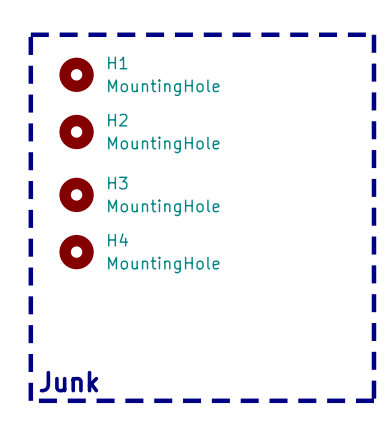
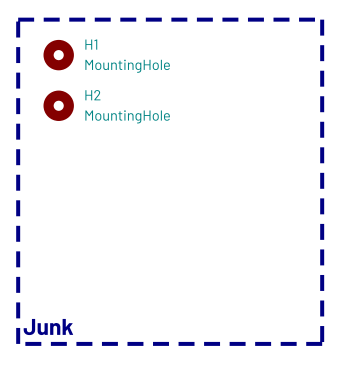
H3: MountingHole (76, 194) -> none
H4: MountingHole (76, 252) -> none

